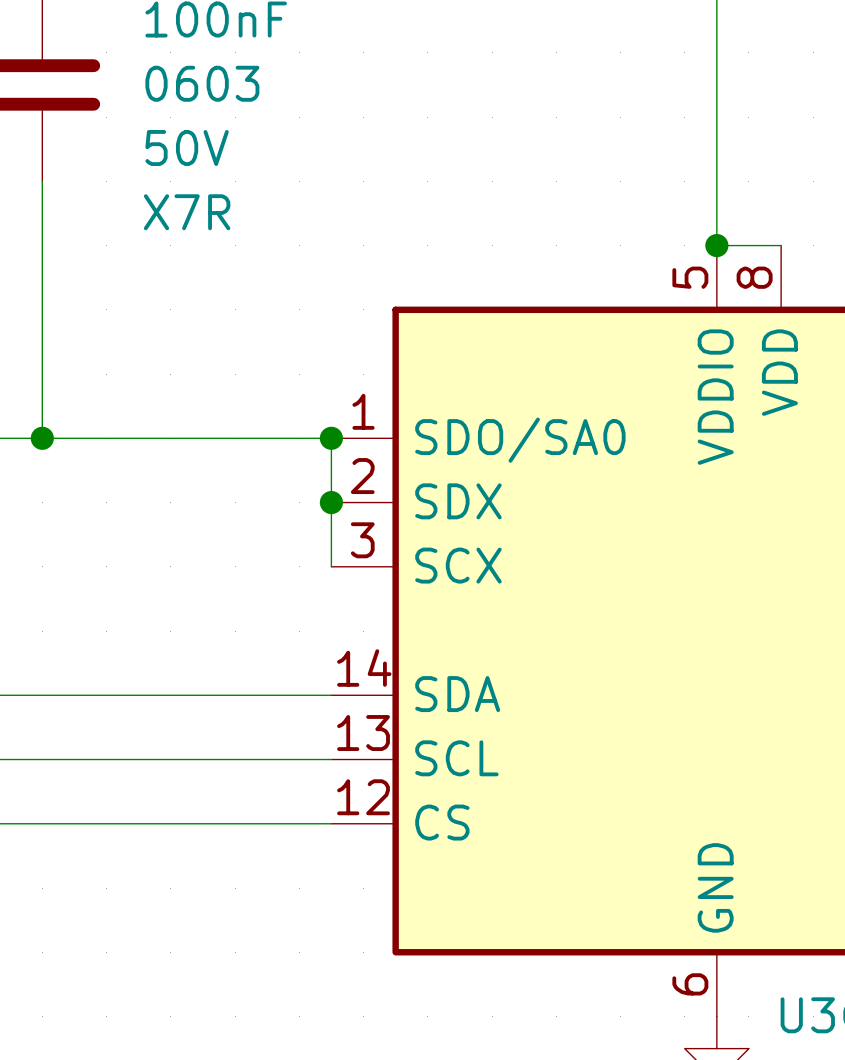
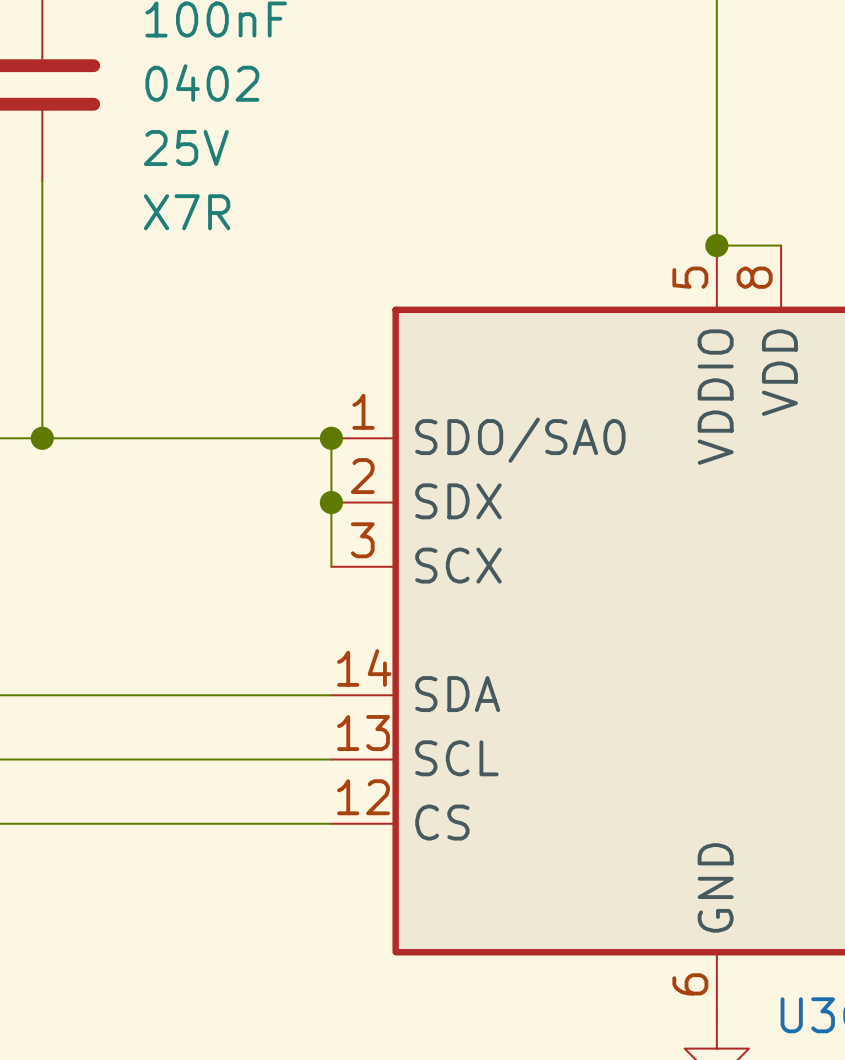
part text: 0603 (202, 83) -> 0402 (202, 83)
part text: 50V (187, 148) -> 25V (186, 148)

